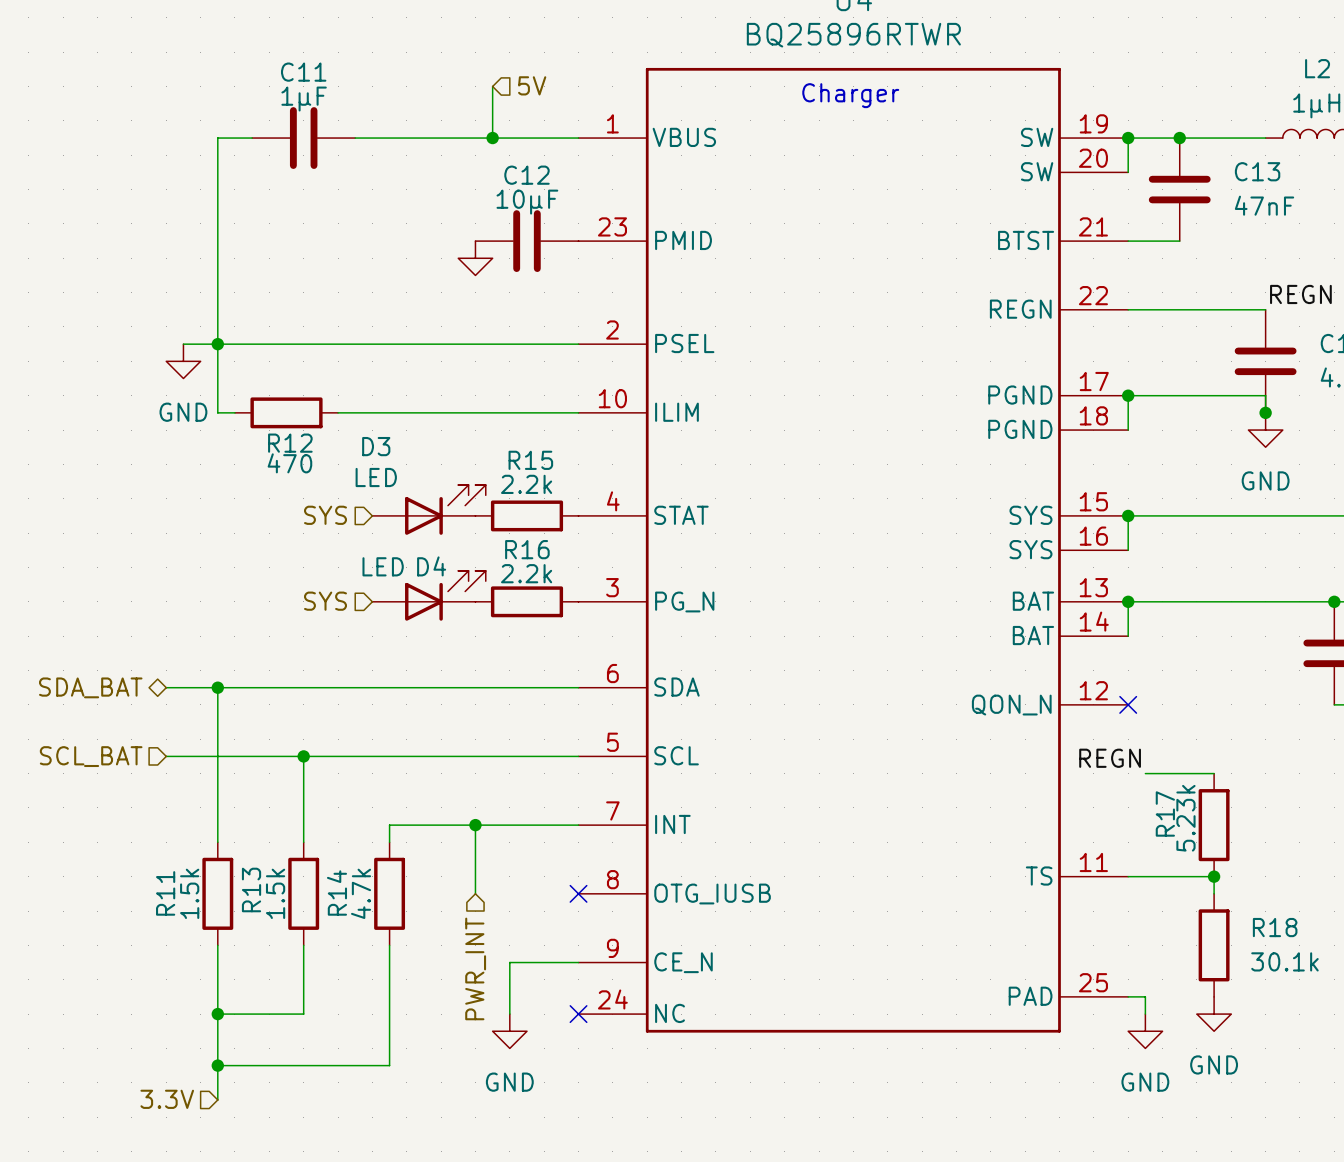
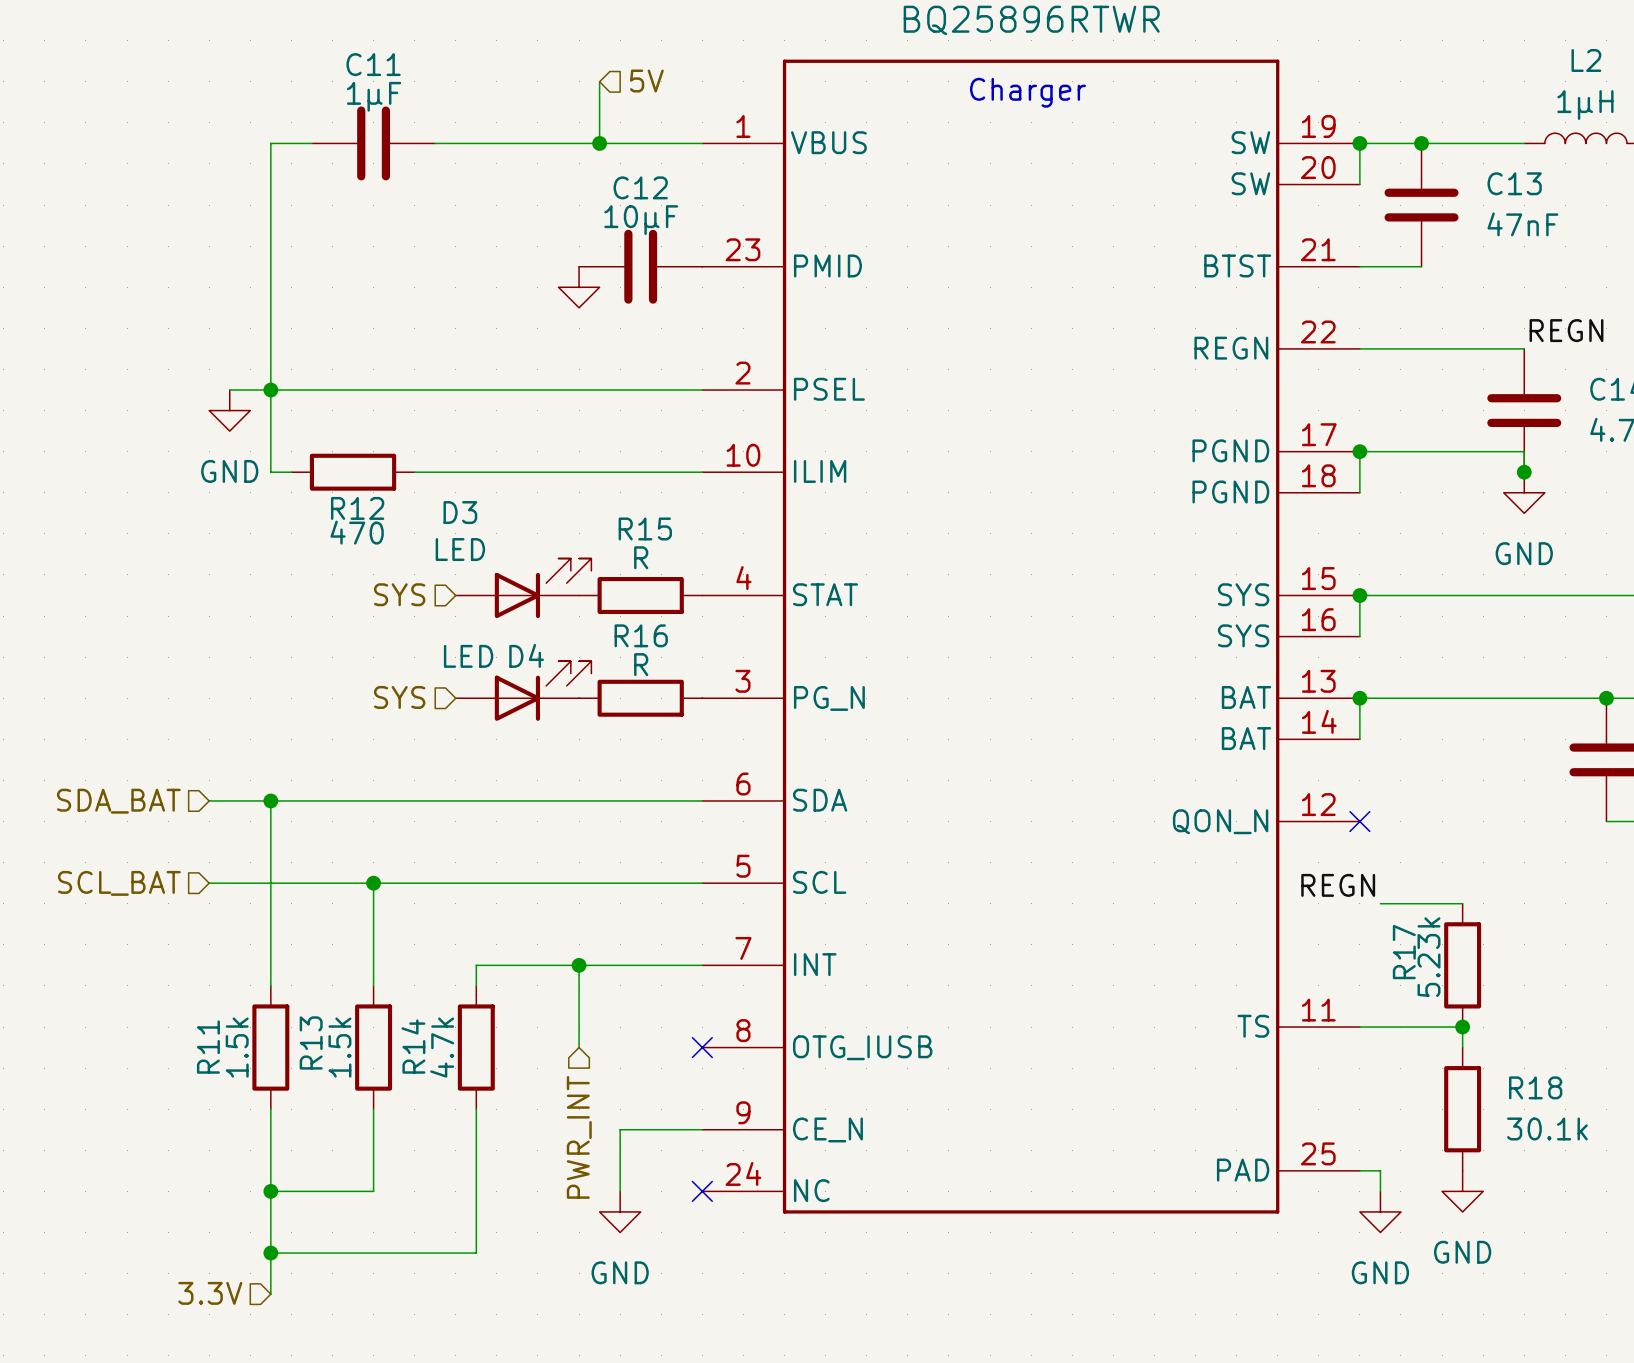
R15 value: 2.2k (526, 484) -> R (641, 557)
R16 value: 2.2k (526, 573) -> R (641, 664)
hierarchical label shape: bidirectional (90, 687) -> input (118, 801)

